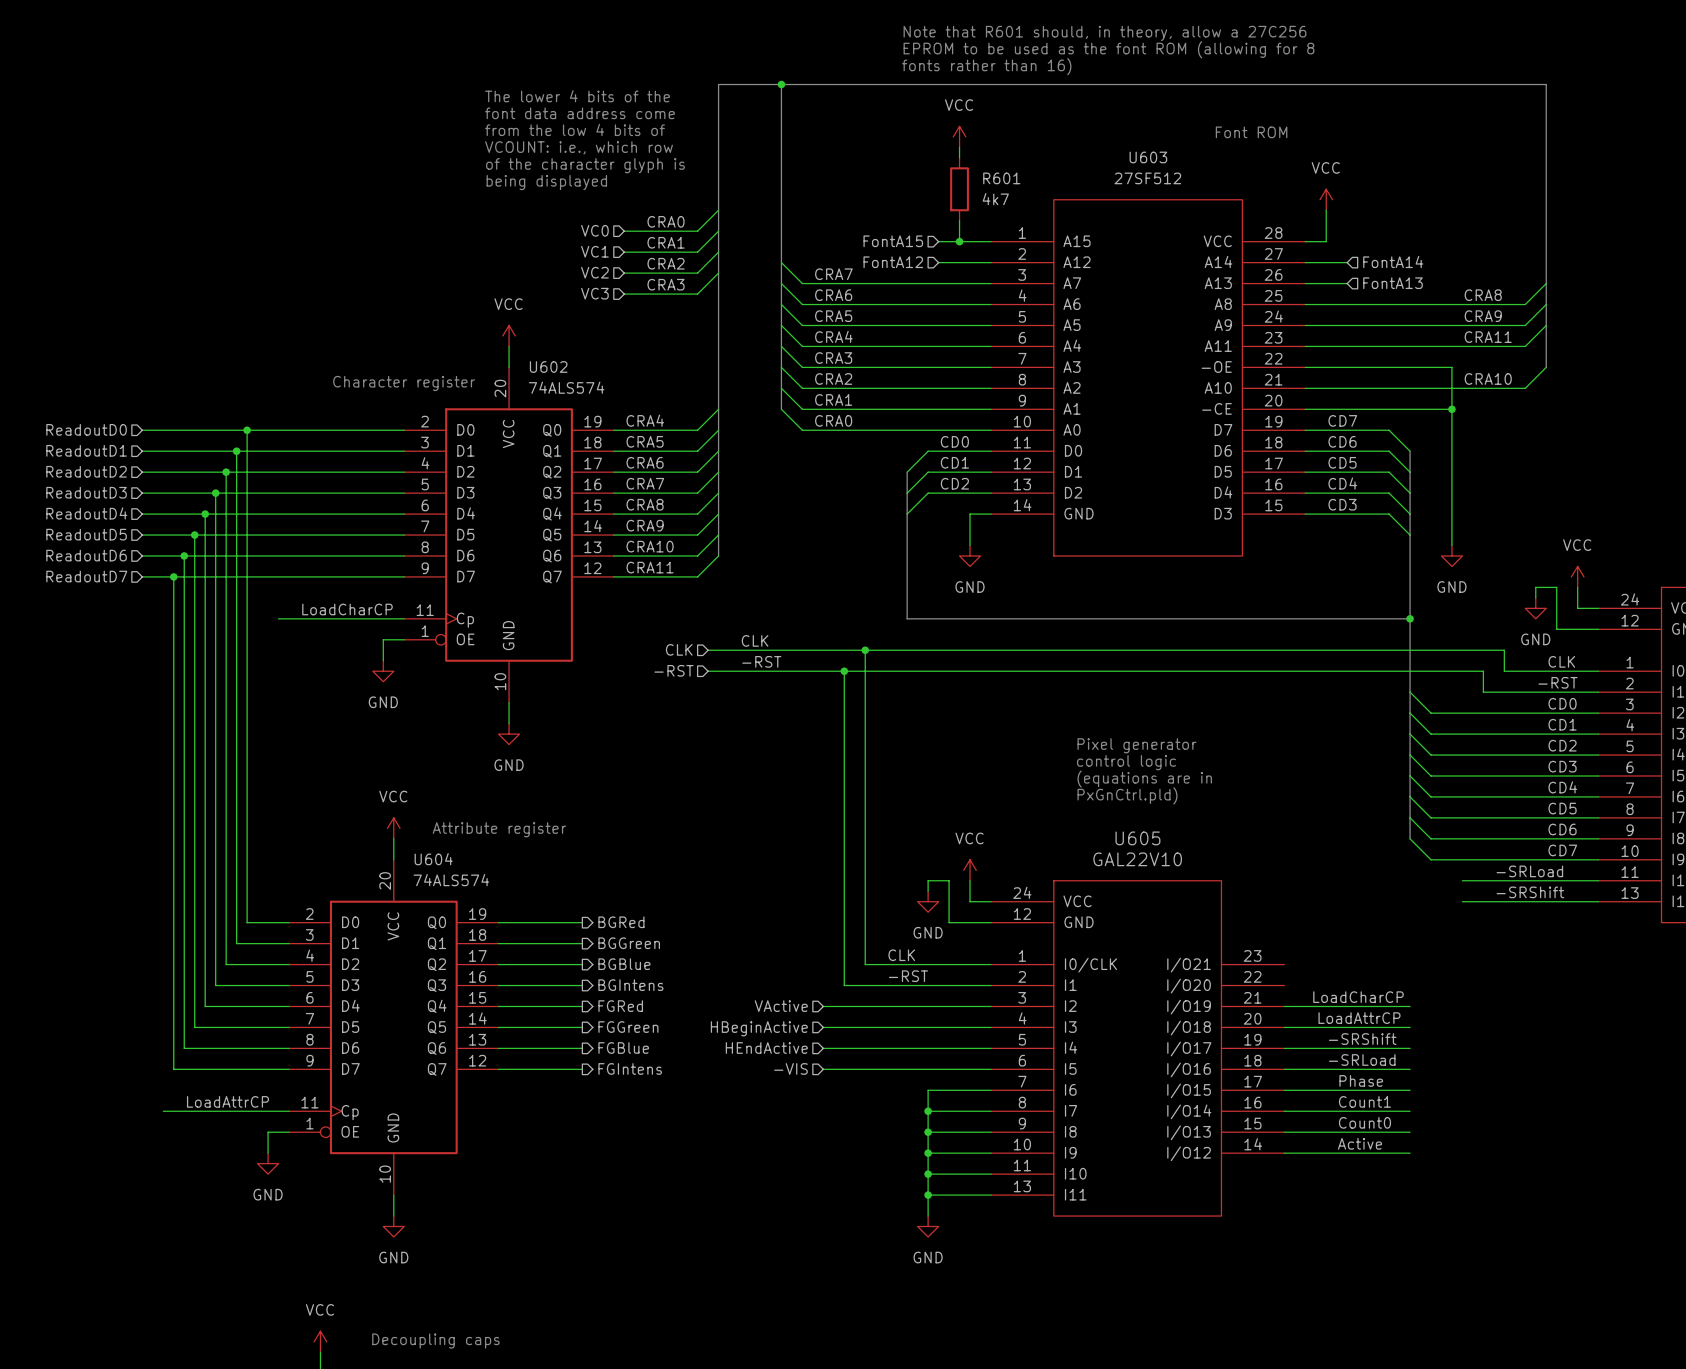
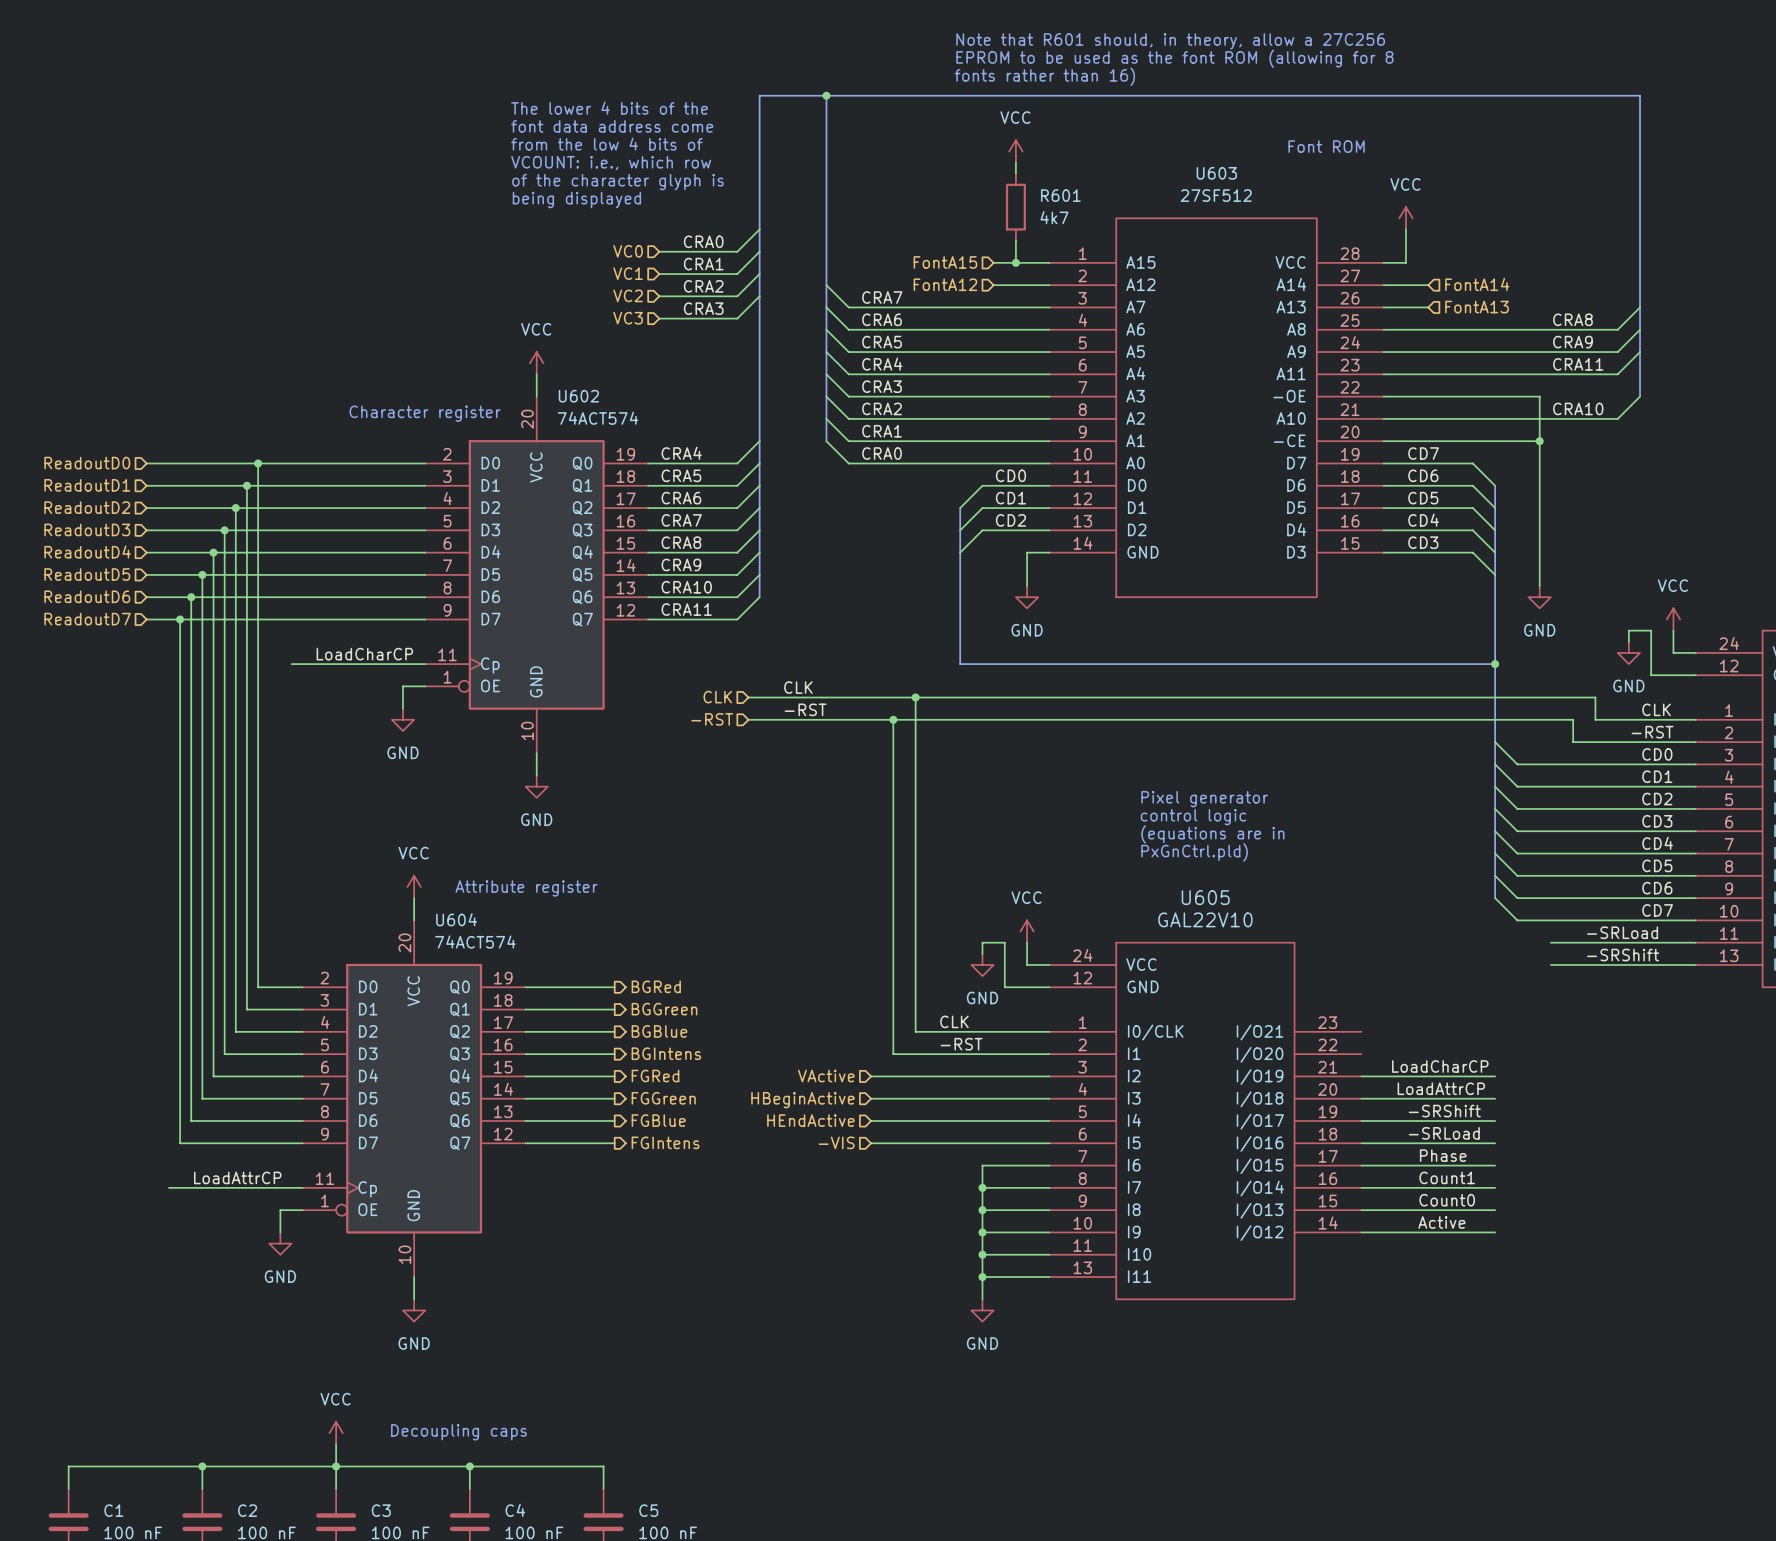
U602 value: 74ALS574 (566, 387) -> 74ACT574 (597, 418)
U604 value: 74ALS574 (451, 880) -> 74ACT574 (475, 942)

